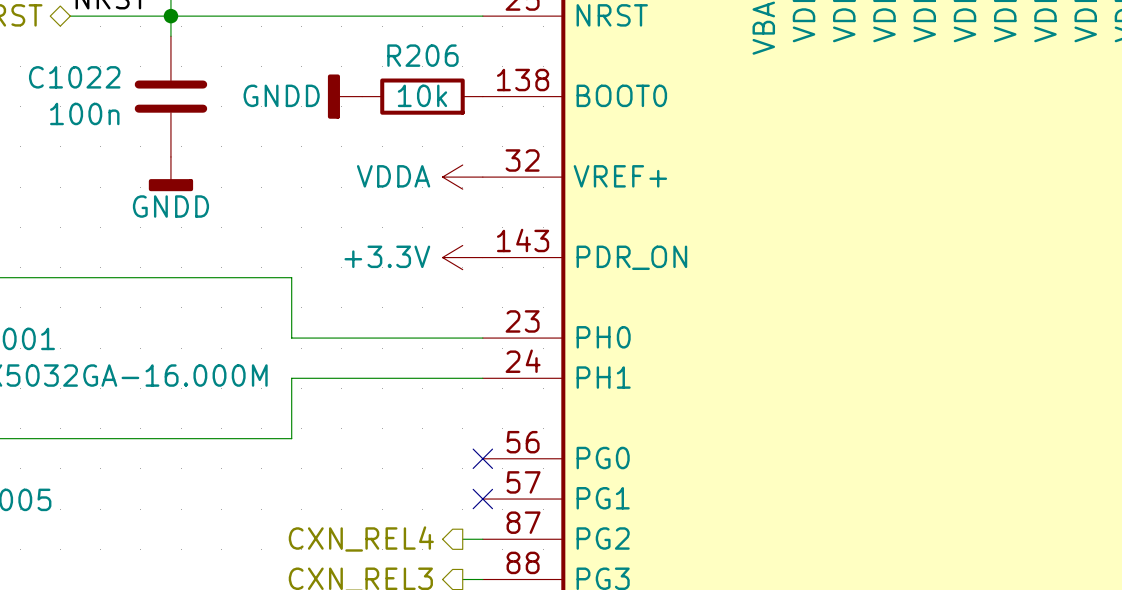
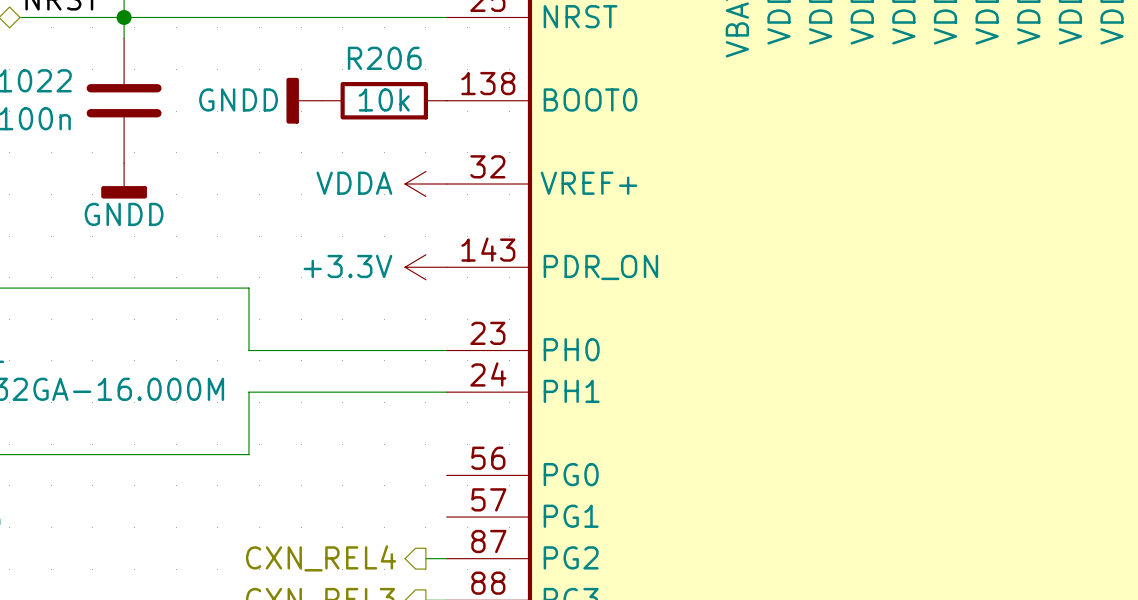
no-connect mark: (482, 458) -> none
no-connect mark: (482, 499) -> none

